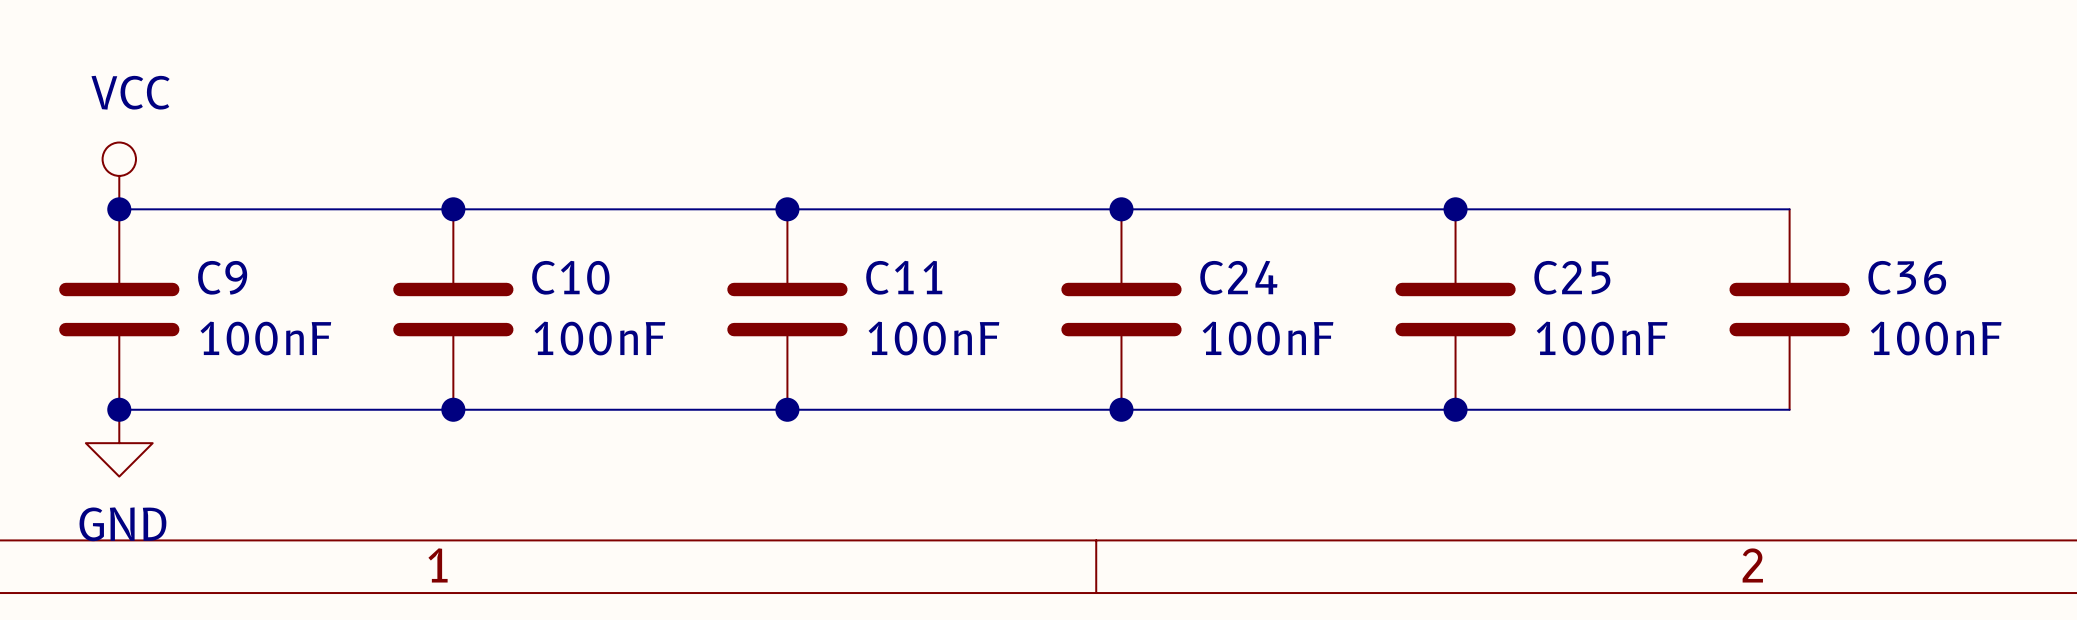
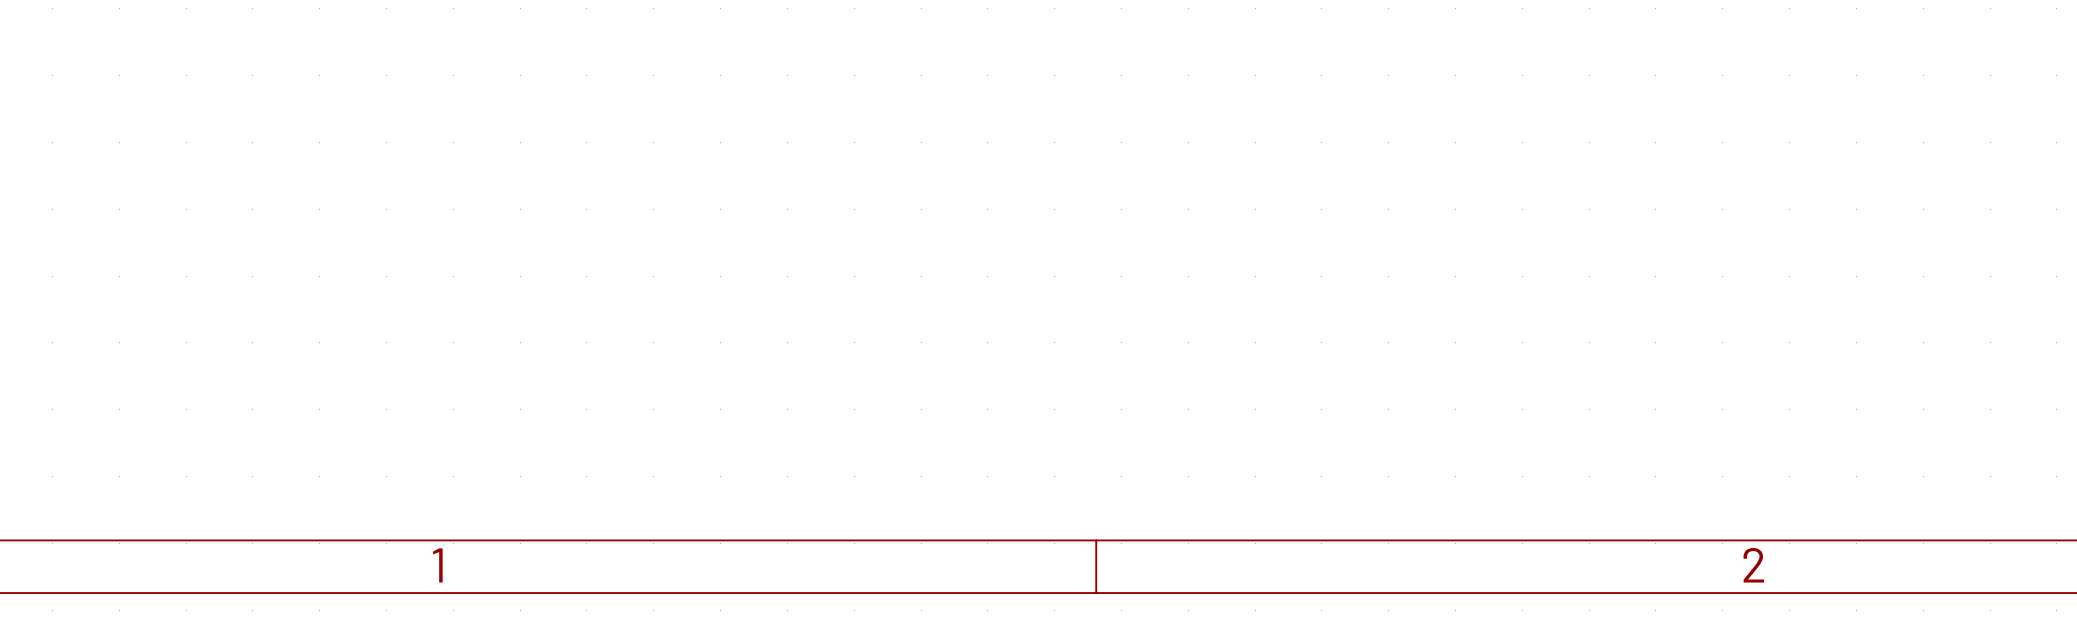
power symbol: VCC (119, 175) -> none
wire: (119, 209) (1789, 209) -> none
junction: (119, 209) -> none
junction: (453, 209) -> none
junction: (787, 209) -> none
junction: (1121, 209) -> none
junction: (1455, 209) -> none
C9: 100nF (119, 309) -> none
C10: 100nF (453, 309) -> none
C11: 100nF (787, 309) -> none
C24: 100nF (1121, 309) -> none
C25: 100nF (1455, 309) -> none
C36: 100nF (1789, 309) -> none
wire: (119, 409) (1789, 409) -> none
junction: (119, 409) -> none
junction: (453, 409) -> none
junction: (787, 409) -> none
junction: (1121, 409) -> none
junction: (1455, 409) -> none
power symbol: GND (119, 443) -> none

